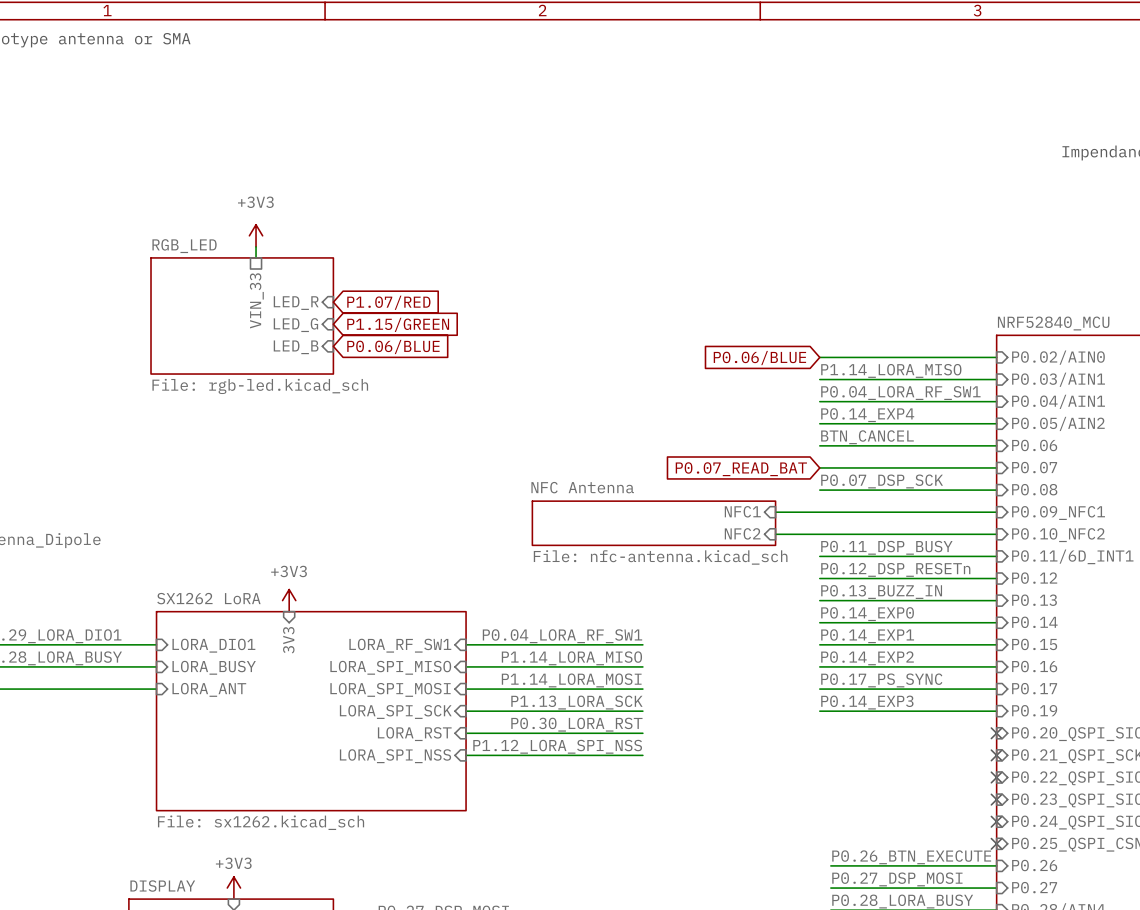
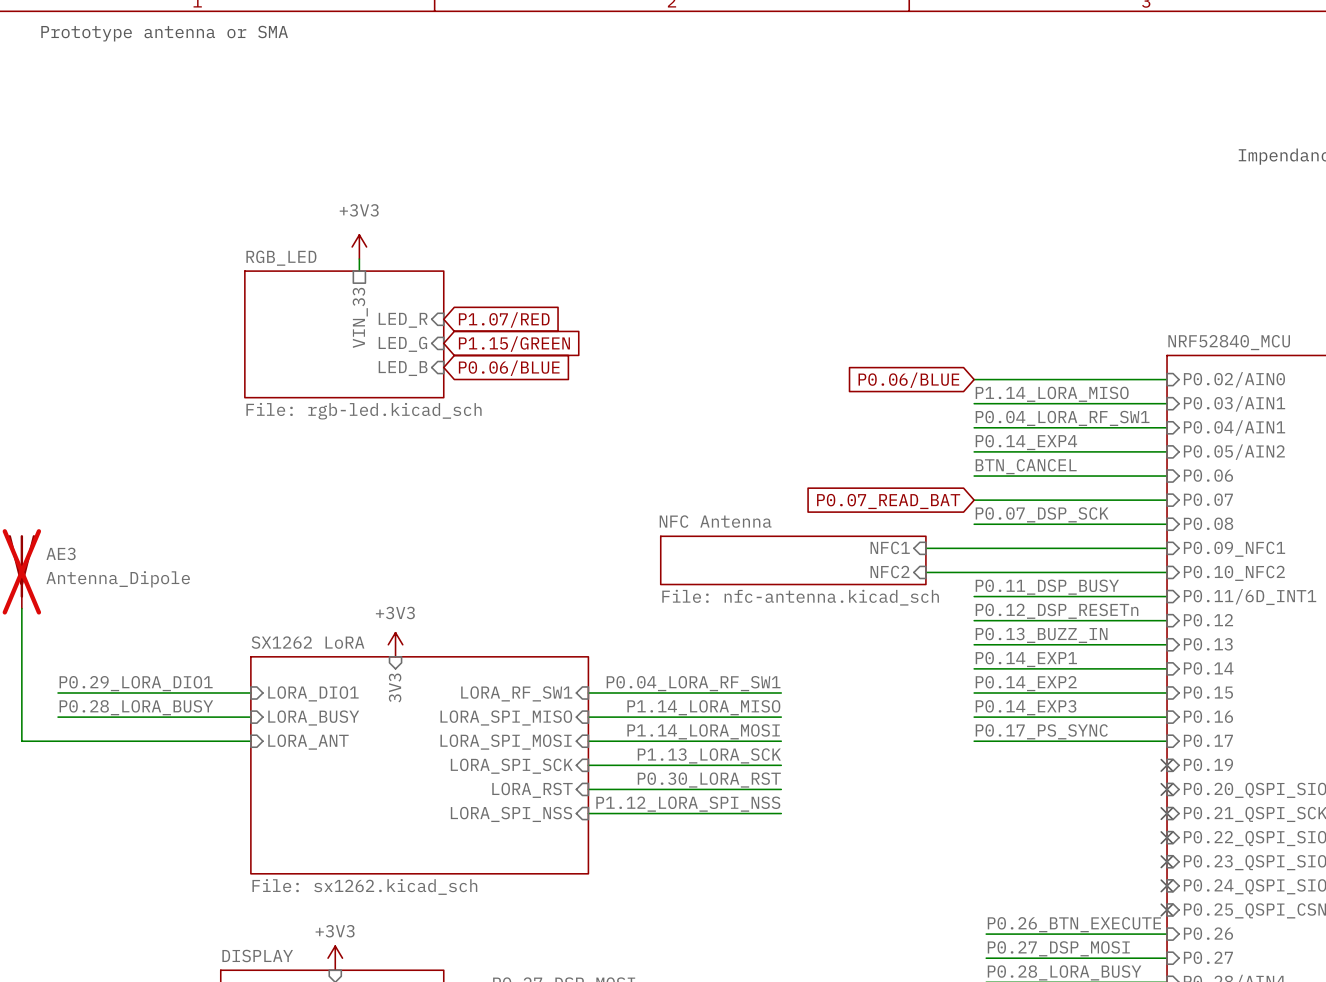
label: P0.14_EXP0 (867, 614) -> P0.14_EXP1 (1026, 659)
label: P0.14_EXP1 (867, 636) -> P0.14_EXP2 (1026, 683)
label: P0.14_EXP2 (867, 658) -> P0.14_EXP3 (1026, 707)
label: P0.14_EXP3 (867, 702) -> none
wire: (819, 711) (996, 711) -> none
no-connect mark: none -> (1167, 765)

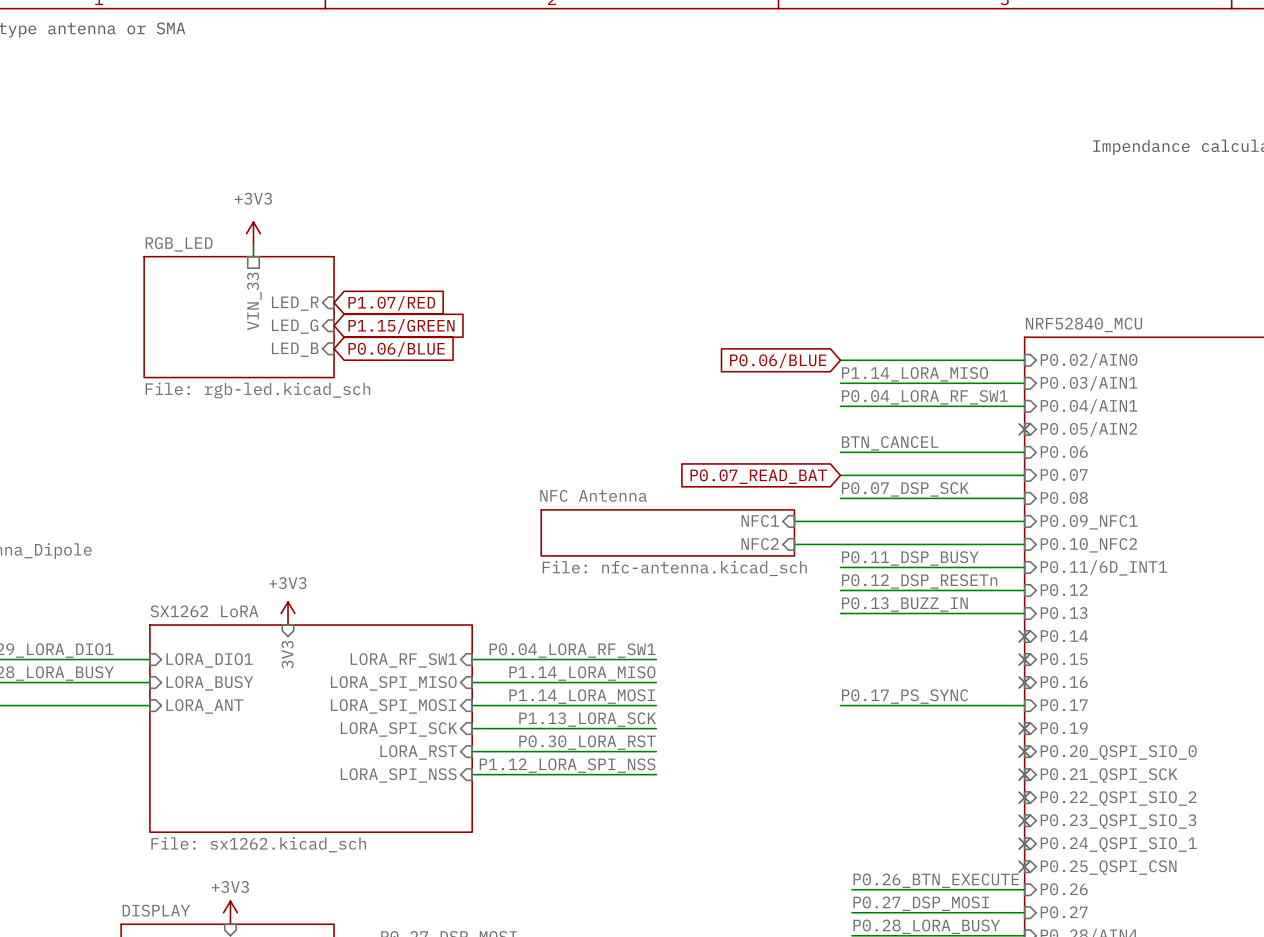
label: P0.14_EXP4 (1026, 442) -> none
wire: (974, 451) (1167, 451) -> none
no-connect mark: none -> (1024, 429)
label: P0.14_EXP1 (1026, 659) -> none
wire: (974, 668) (1167, 668) -> none
no-connect mark: none -> (1024, 636)
label: P0.14_EXP2 (1026, 683) -> none
wire: (974, 693) (1167, 693) -> none
no-connect mark: none -> (1024, 659)
label: P0.14_EXP3 (1026, 707) -> none
wire: (974, 717) (1167, 717) -> none
no-connect mark: none -> (1024, 682)

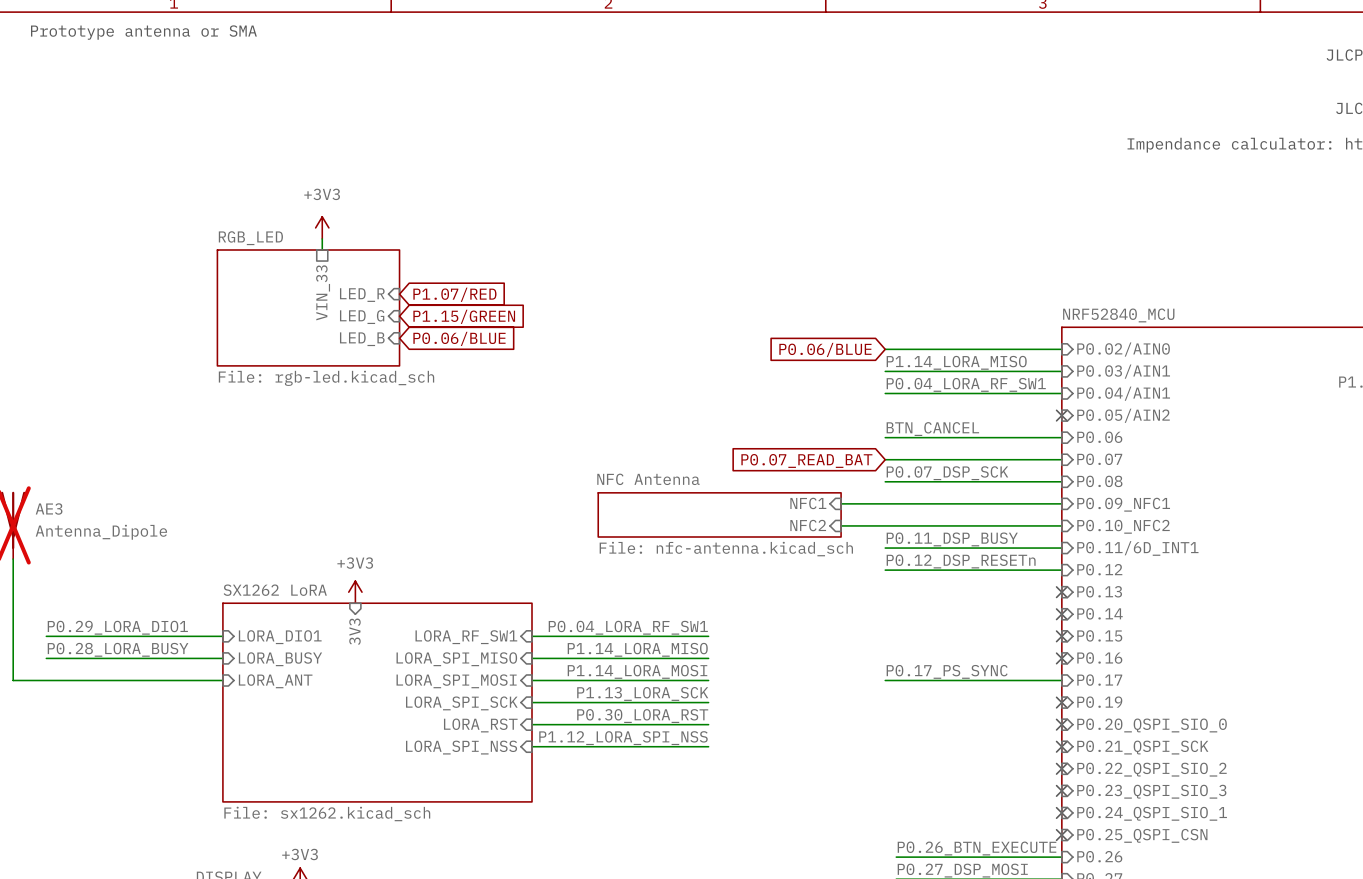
label: P0.13_BUZZ_IN (904, 604) -> none
wire: (840, 613) (1024, 613) -> none
no-connect mark: none -> (1061, 592)

